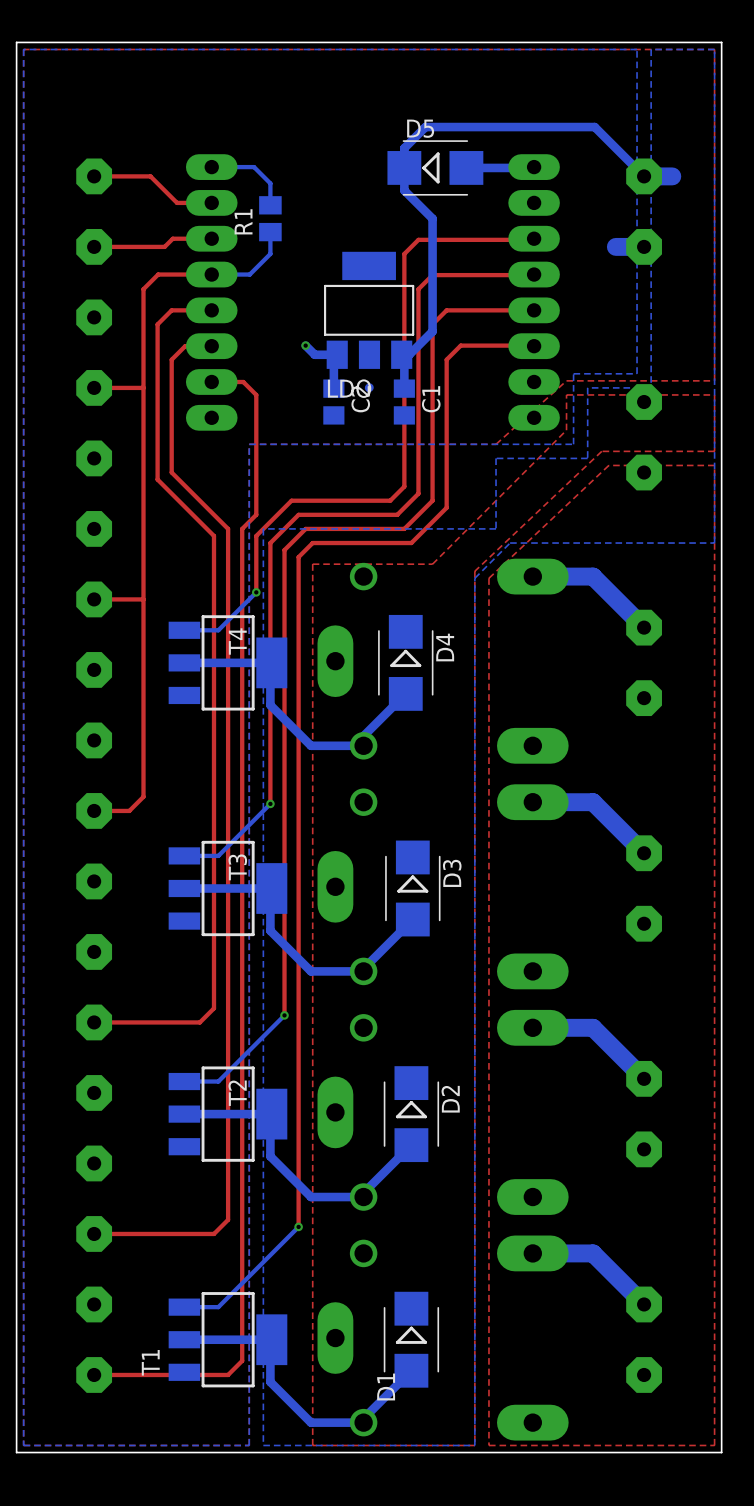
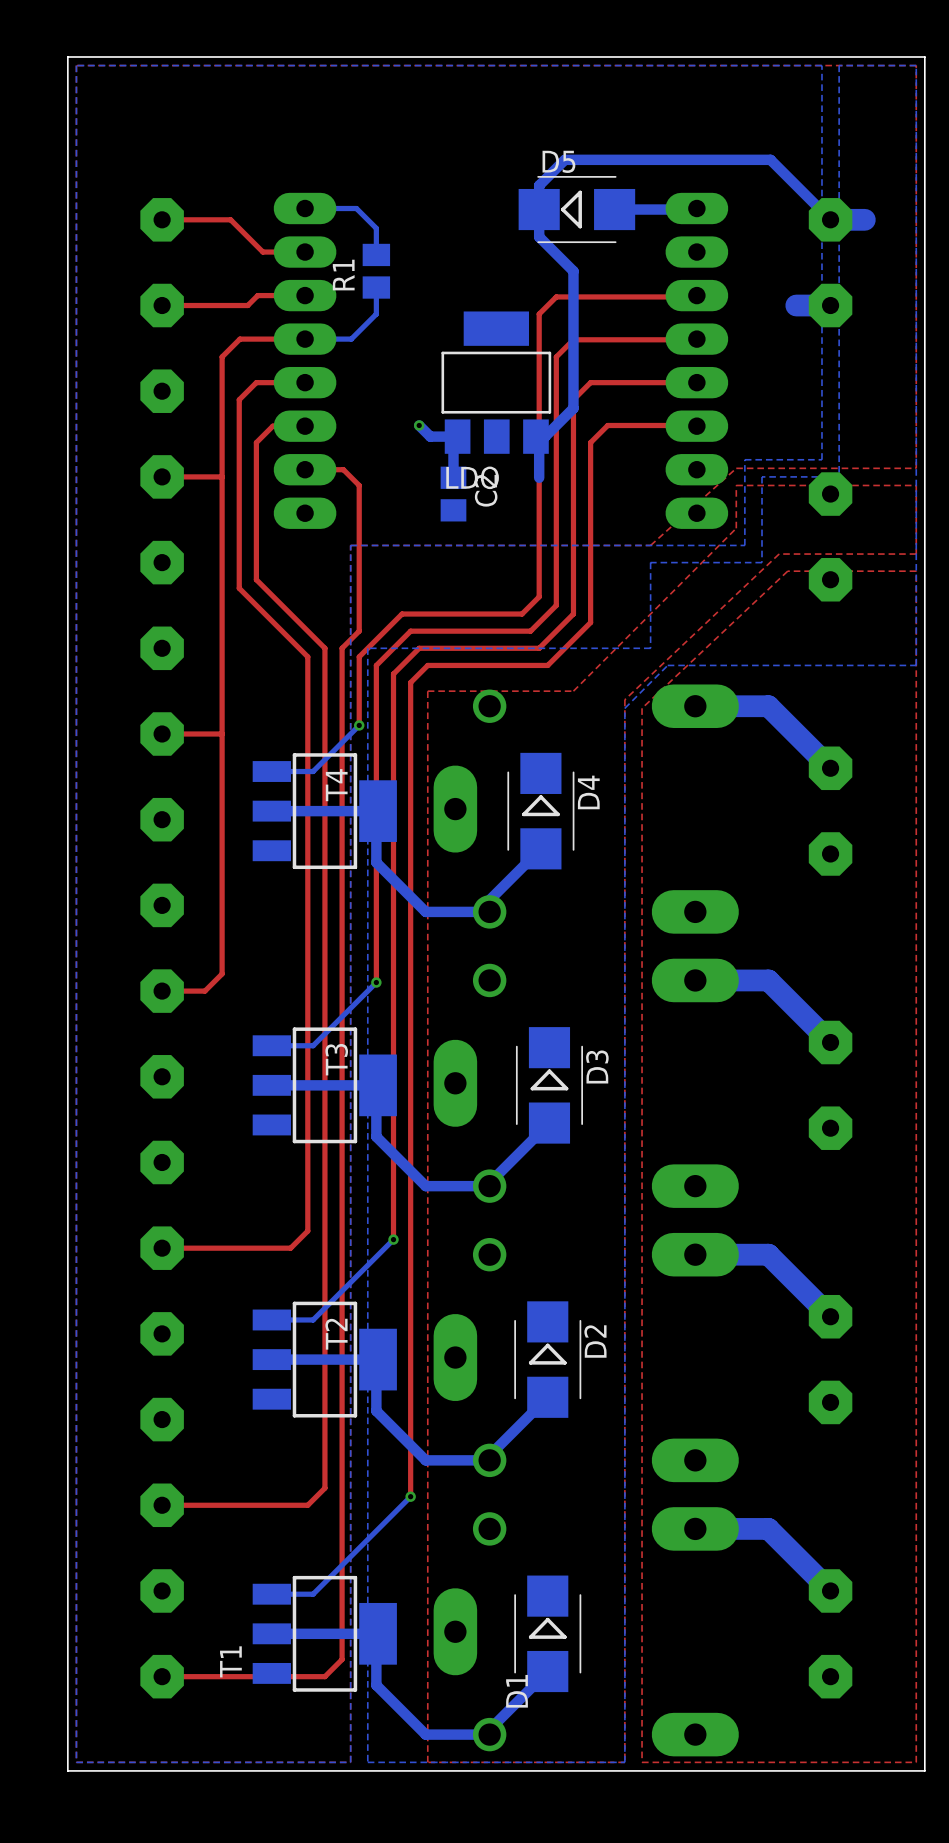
bottom track: (369, 387) (369, 387) -> none
C1: (404, 402) -> none

